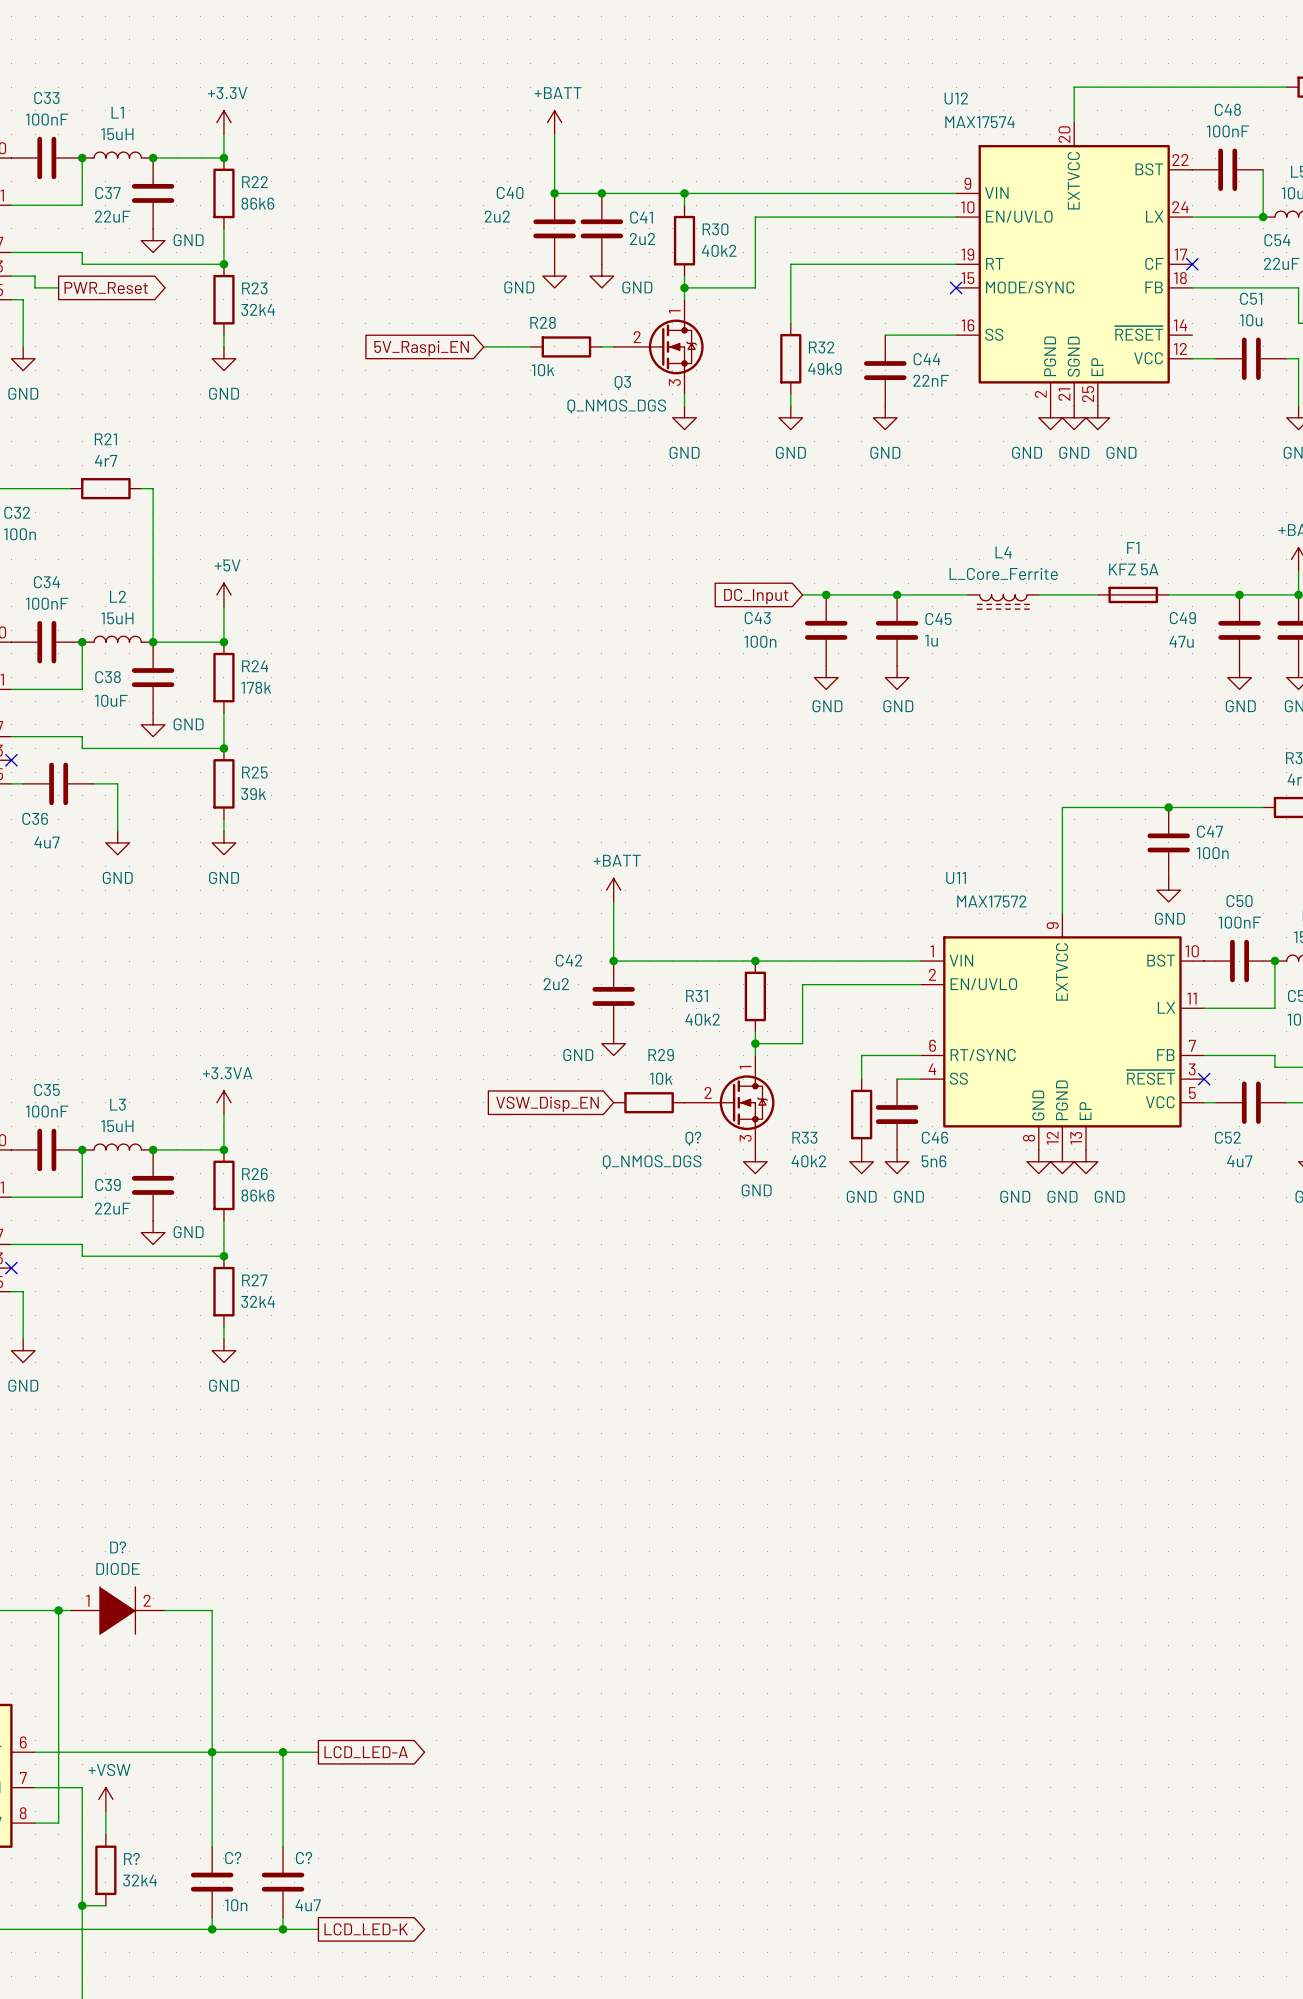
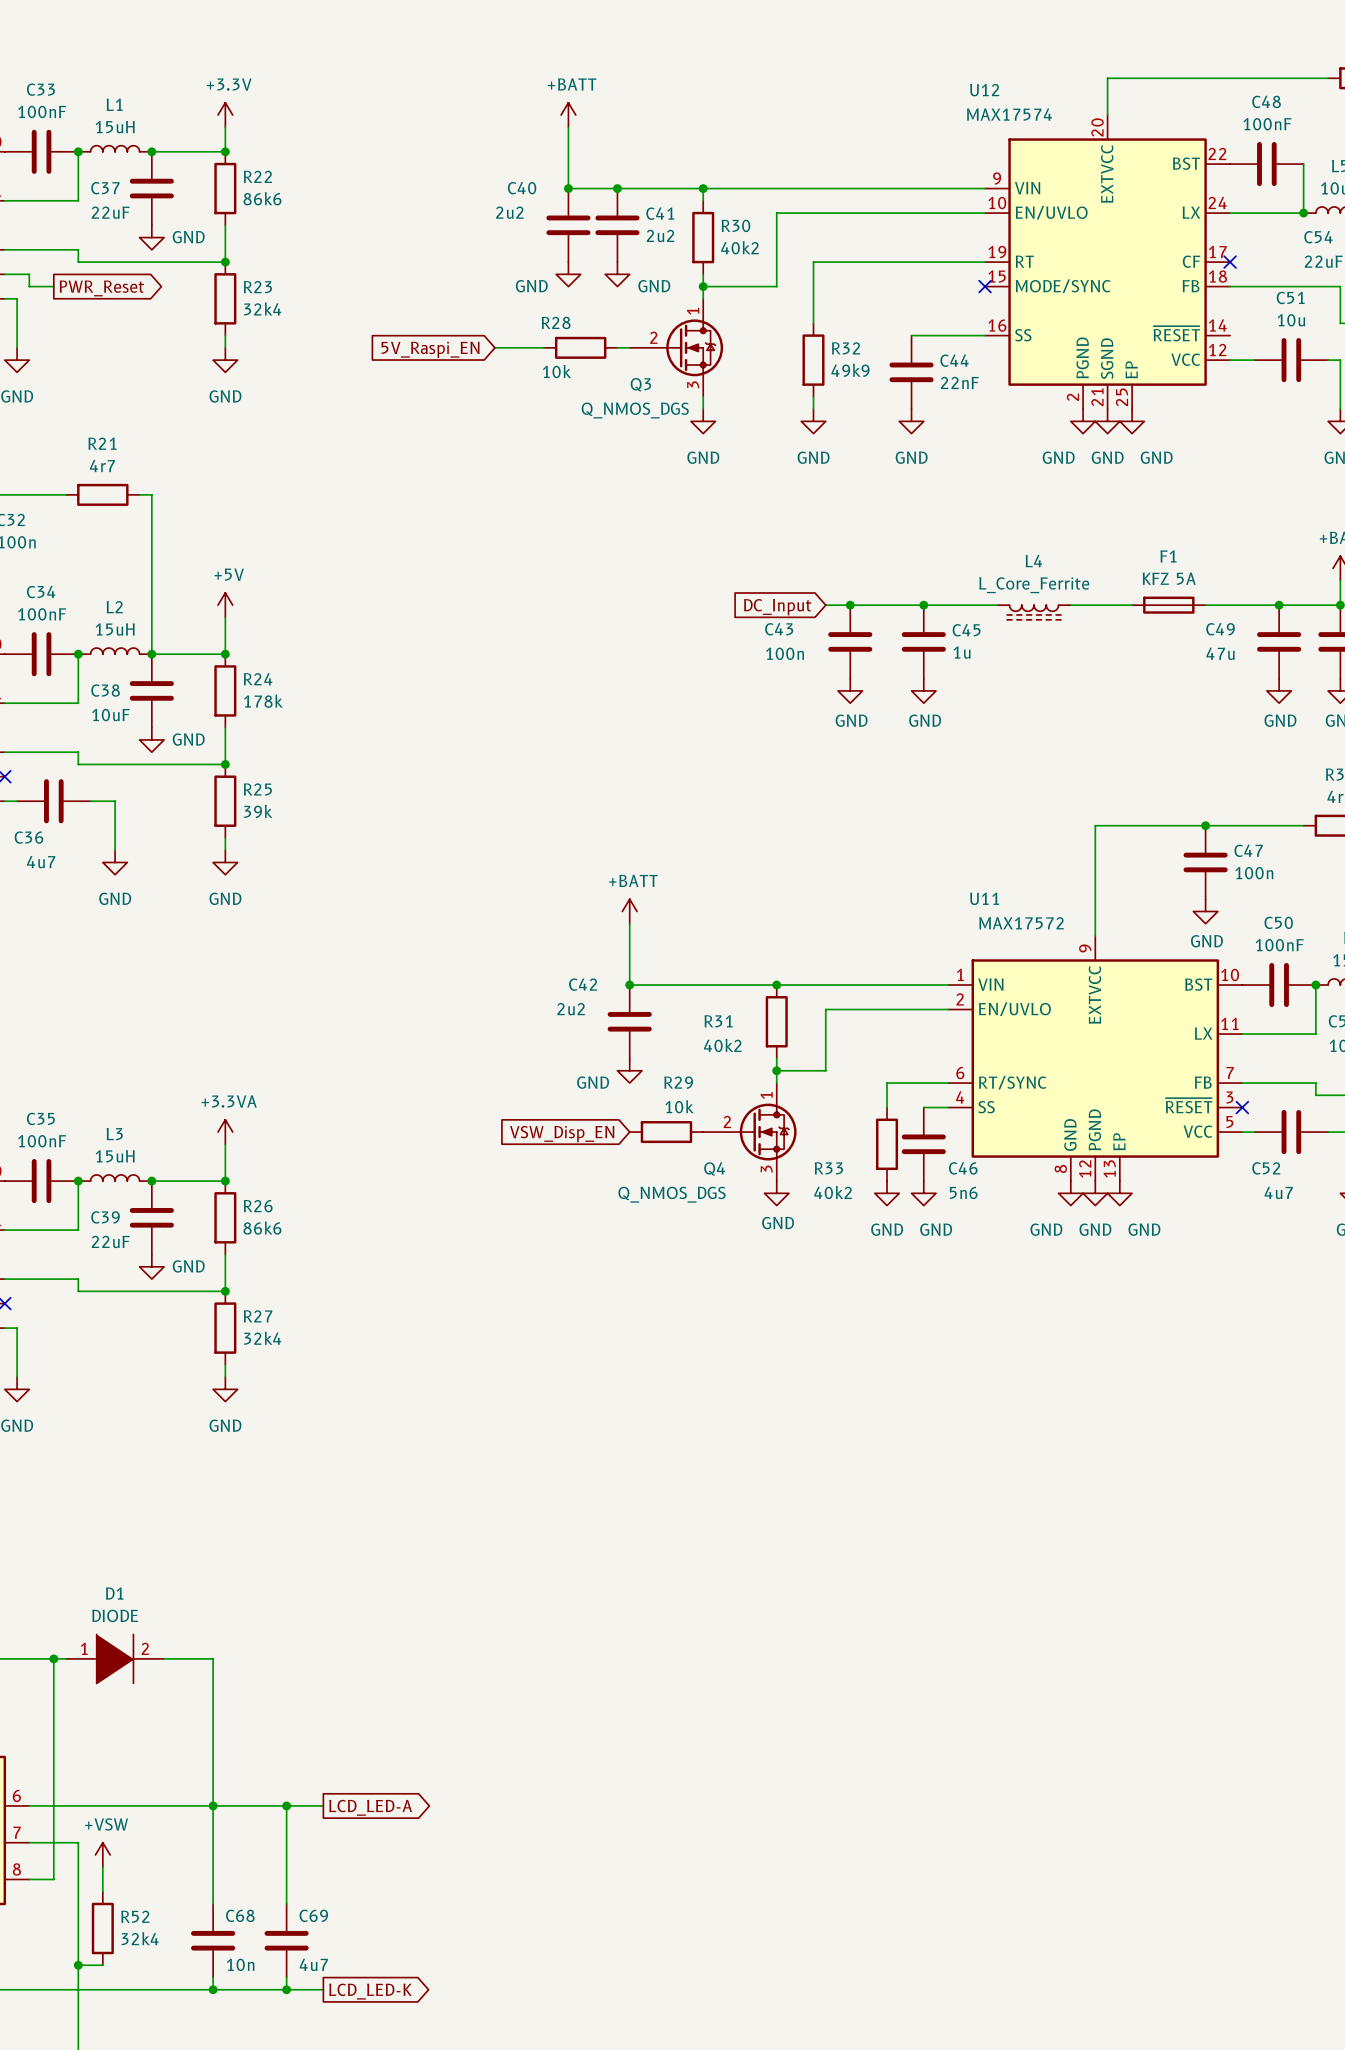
Q? name: Q? (693, 1138) -> Q4 (714, 1168)
D? name: D? (118, 1547) -> D1 (114, 1593)
R? name: R? (131, 1858) -> R52 (135, 1916)
C? name: C? (233, 1858) -> C68 (240, 1915)
C? name: C? (304, 1858) -> C69 (313, 1915)

